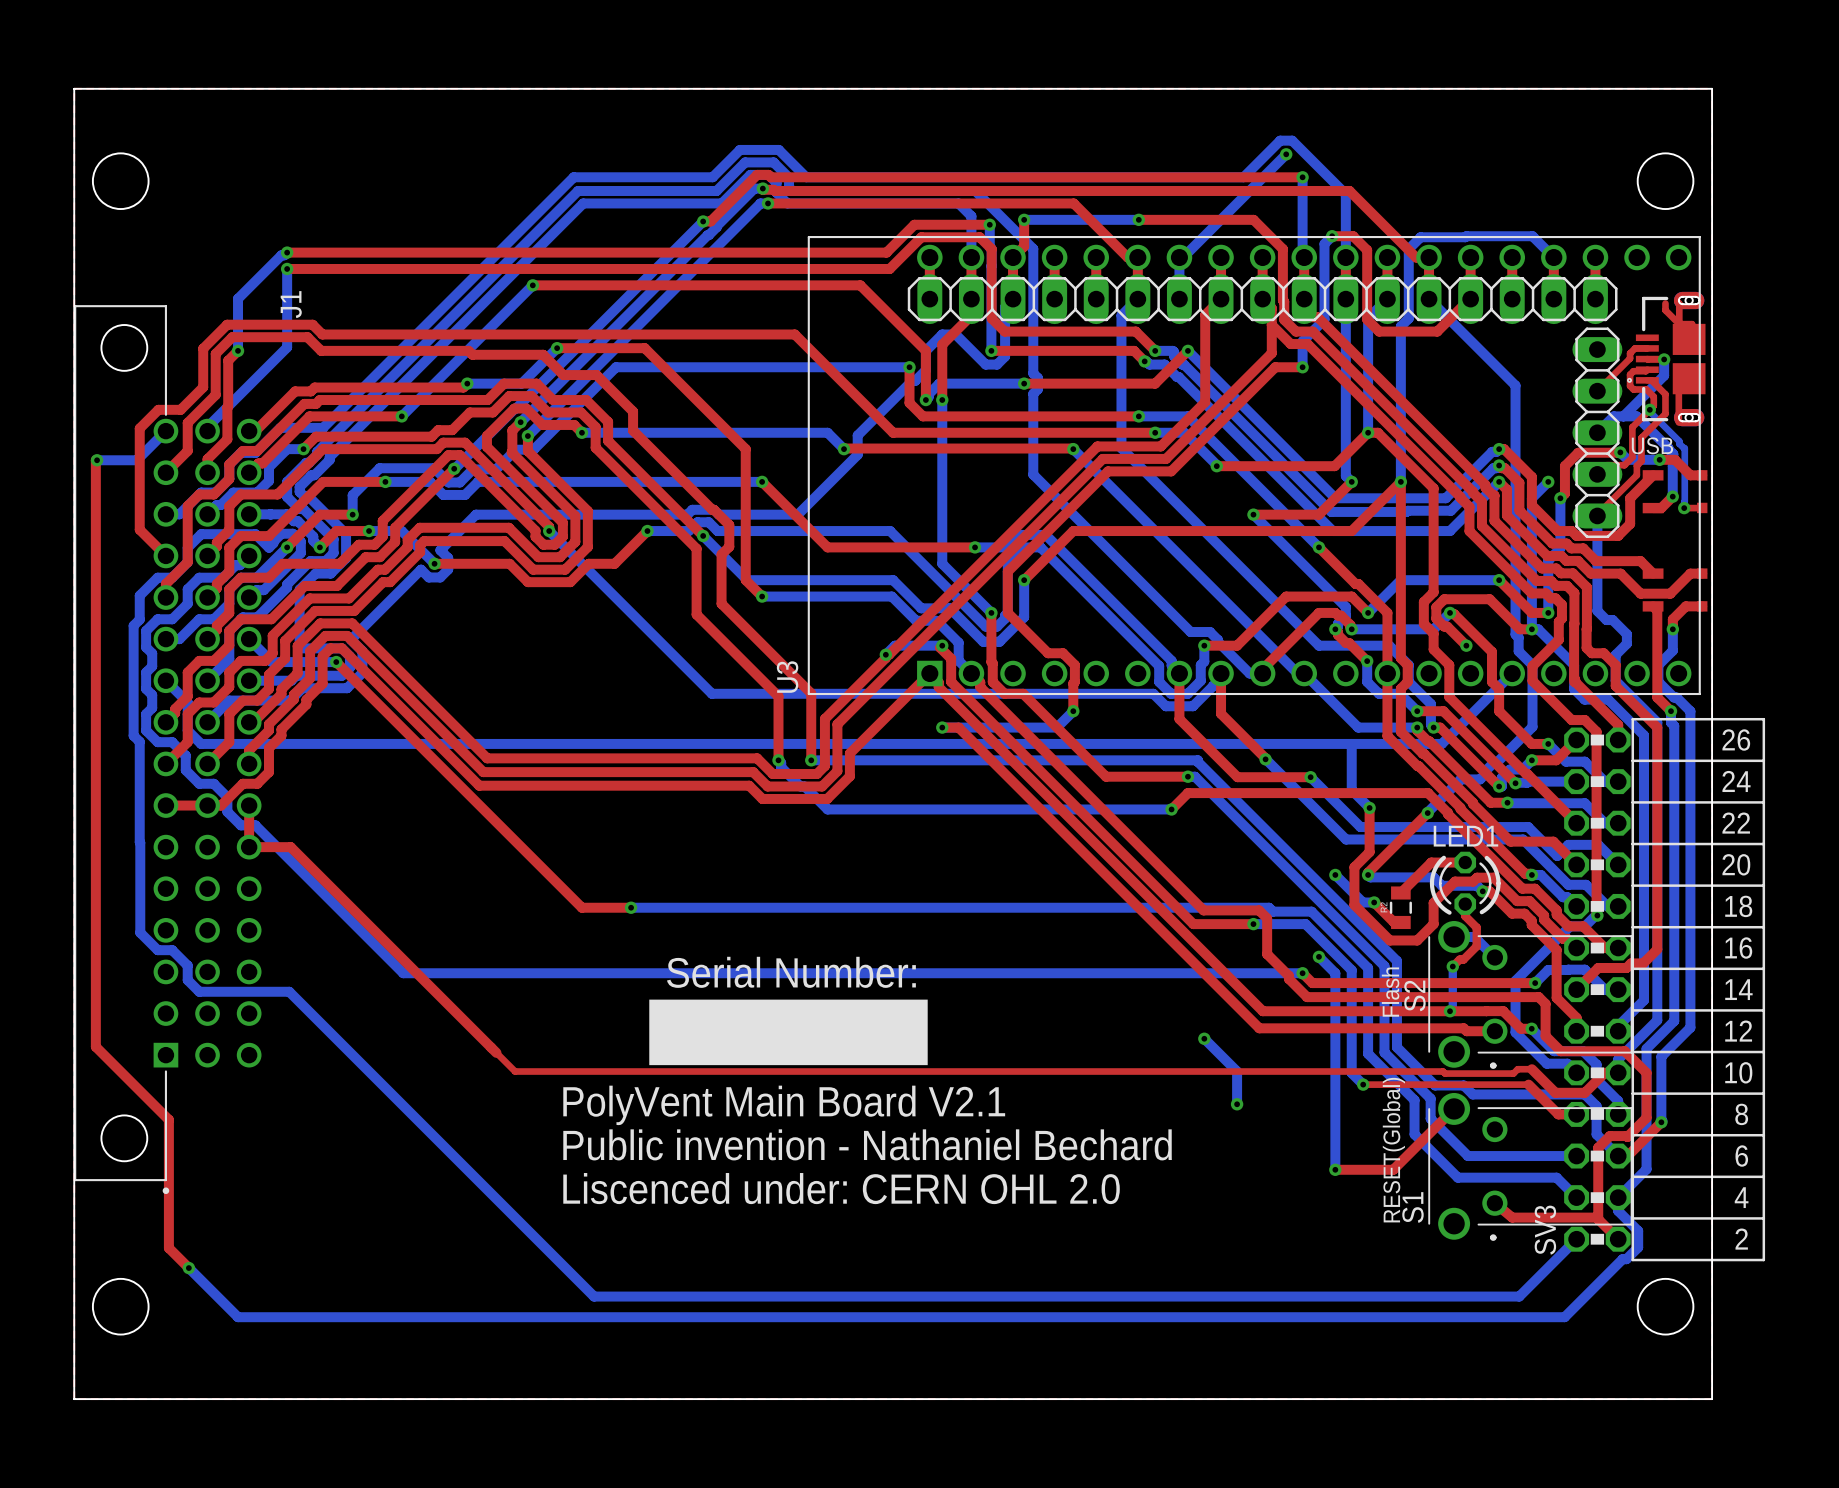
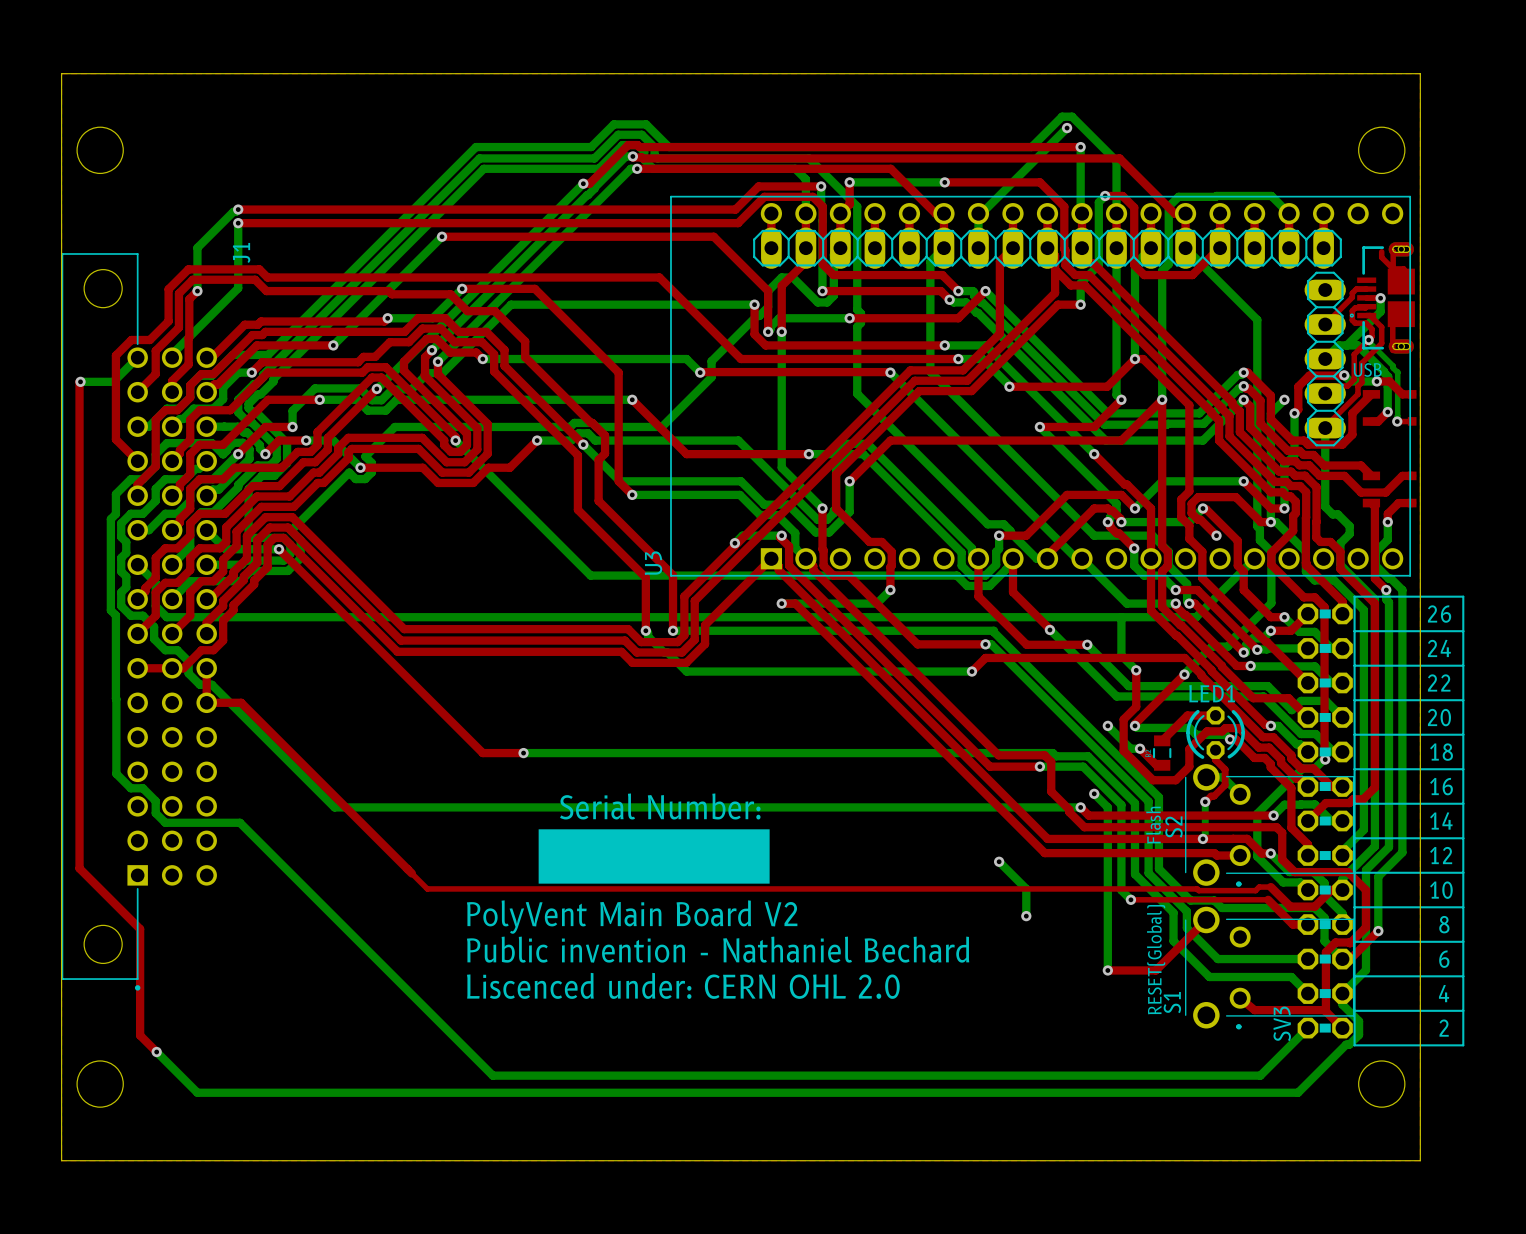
text: PolyVent Main Board V2.1 (784, 1105) -> PolyVent Main Board V2 (632, 917)

